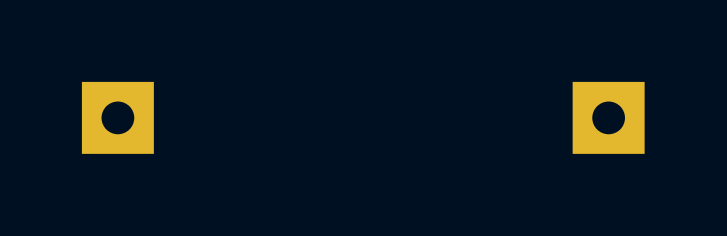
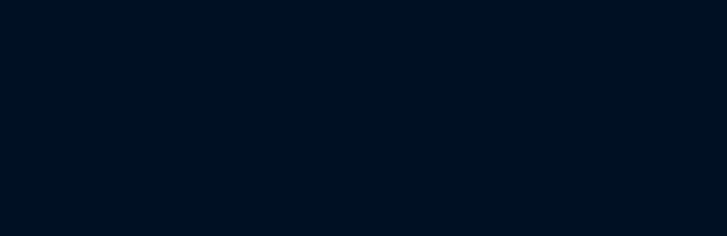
part: (117, 117) -> none
part: (608, 117) -> none

